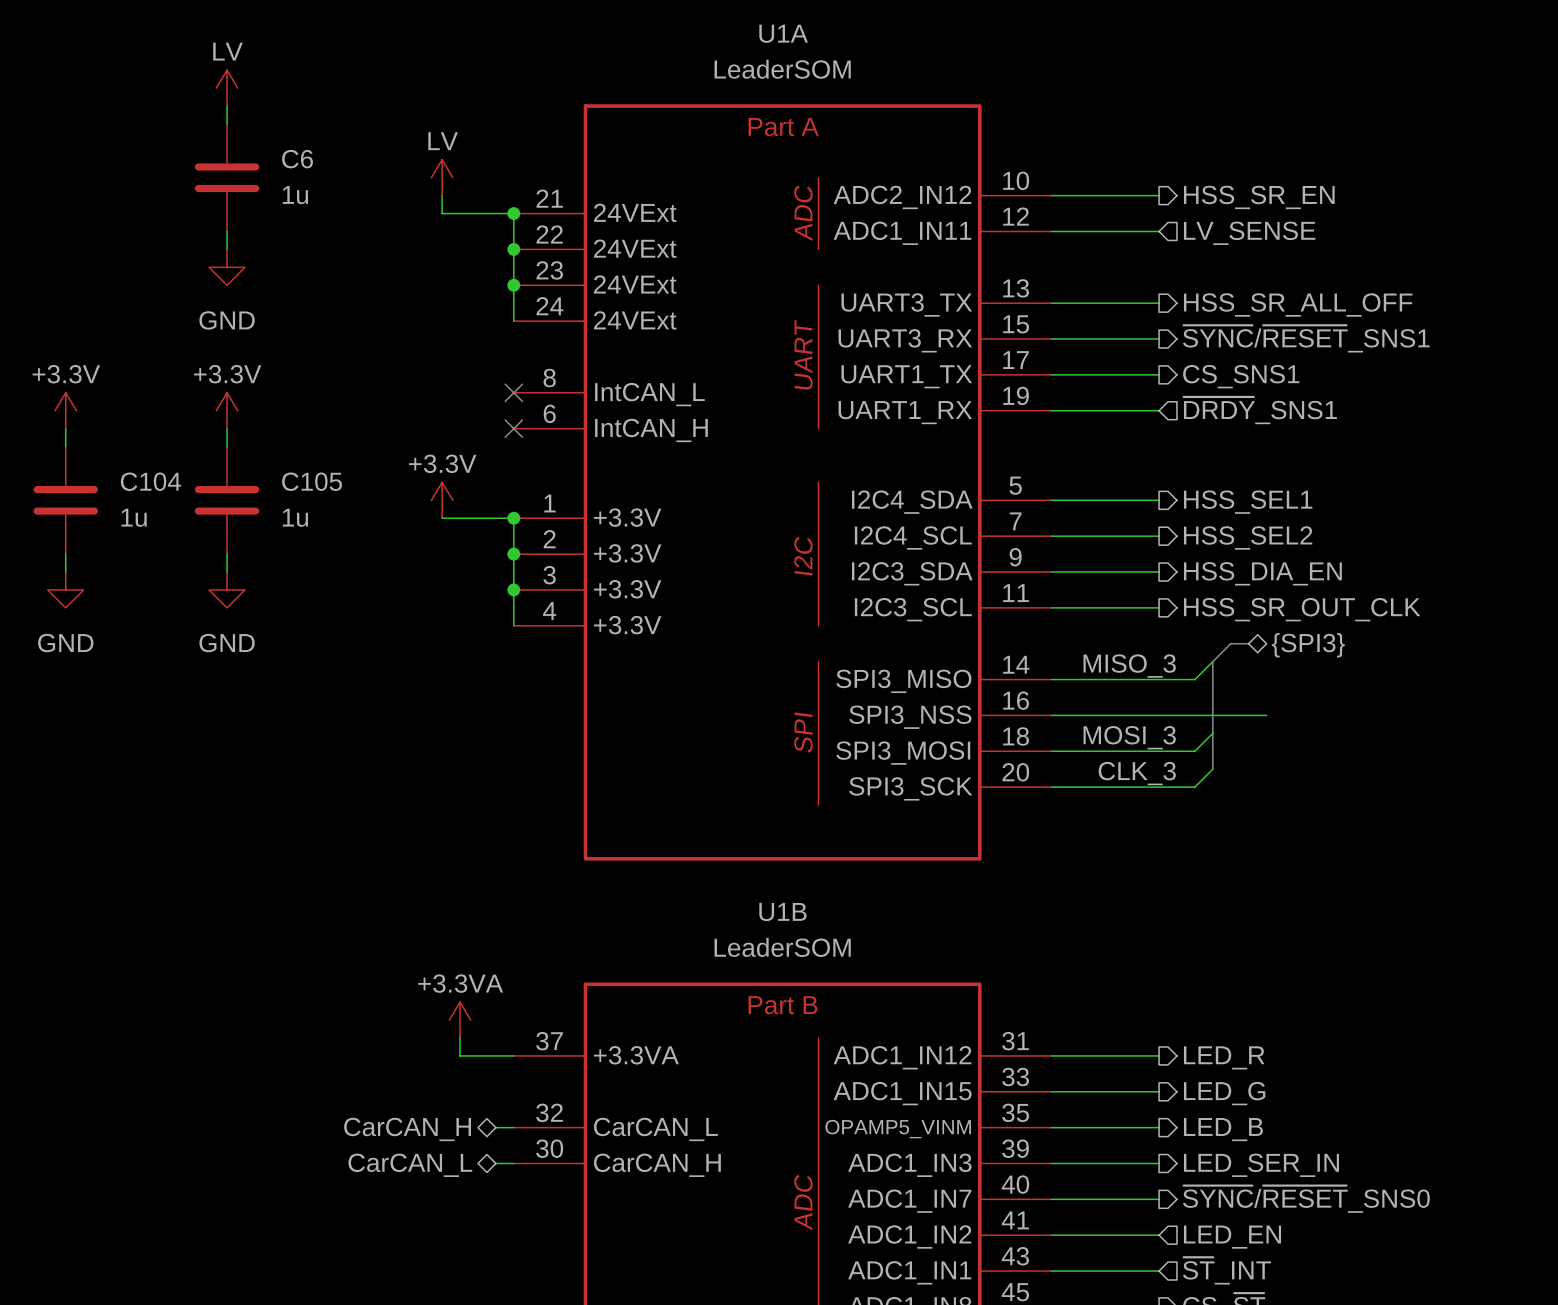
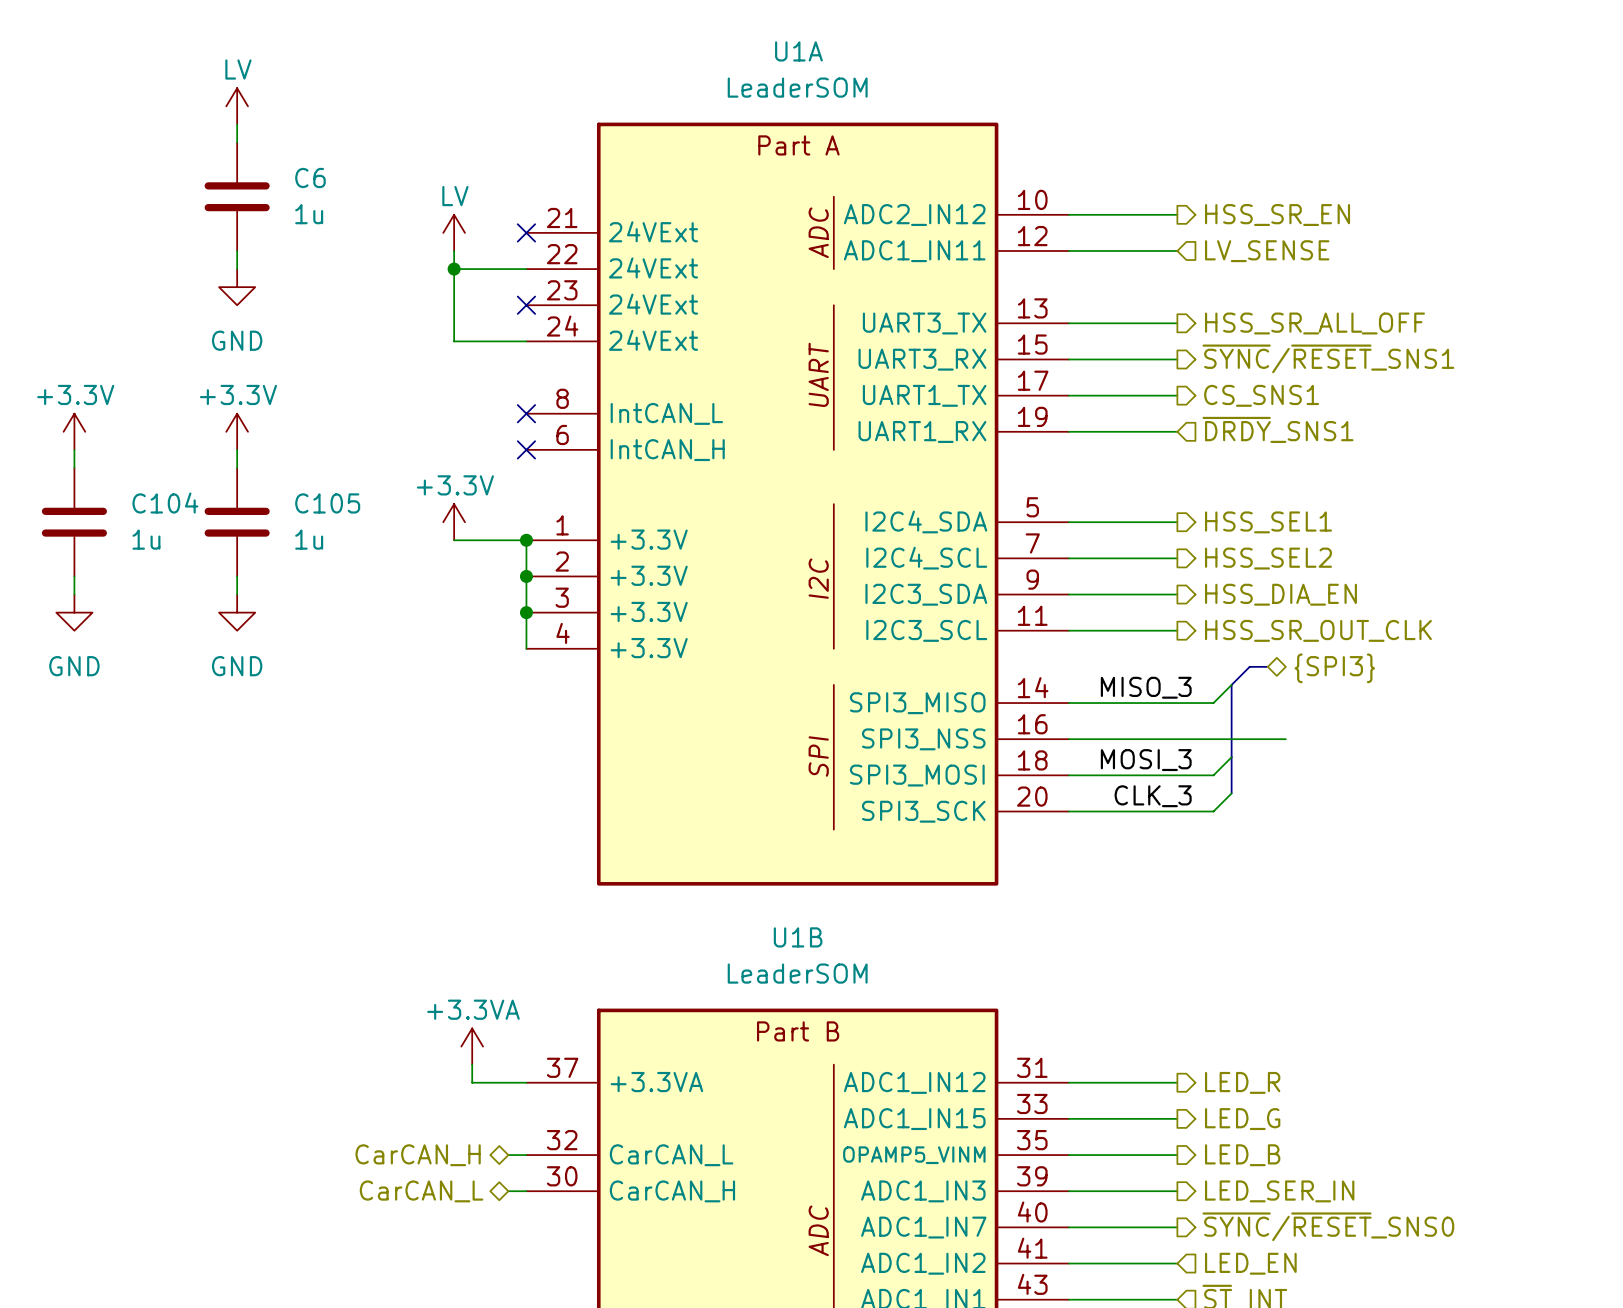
power symbol position: LV (442, 177) -> LV (454, 232)
wire: (442, 195) (442, 213) (513, 213) (513, 321) -> (454, 250) (454, 341) (526, 341)
junction: (513, 213) -> none
no-connect mark: none -> (526, 232)
wire: none -> (454, 269) (526, 269)
junction: none -> (454, 269)
junction: (513, 249) -> none
junction: (513, 285) -> none
no-connect mark: none -> (526, 305)

